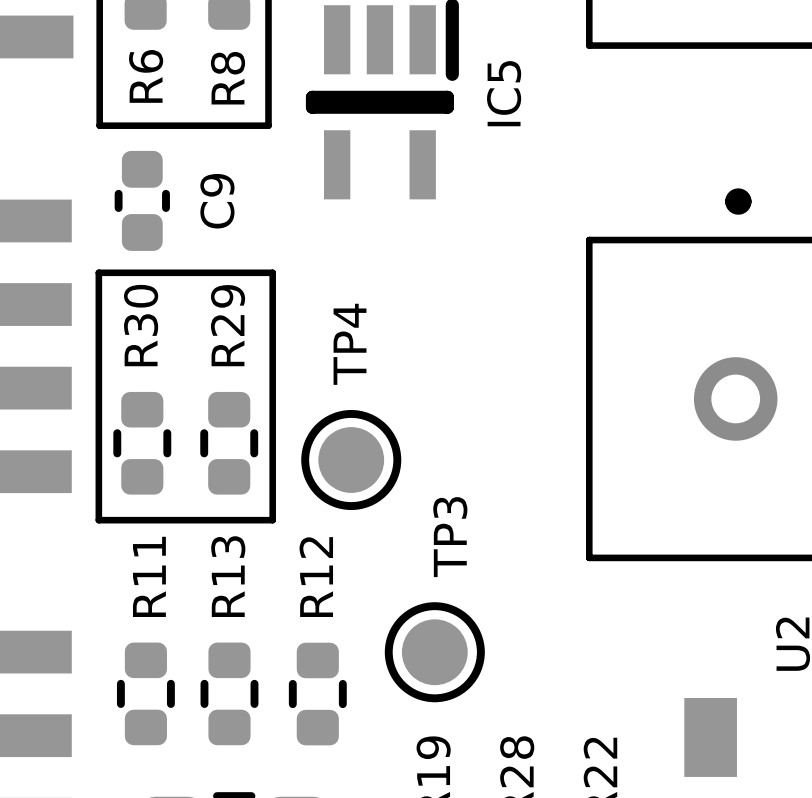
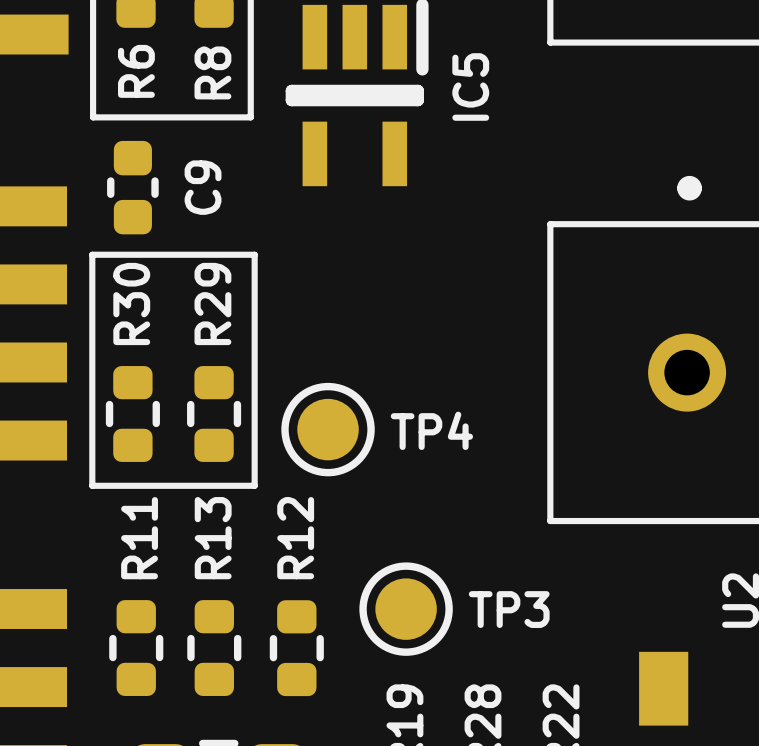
TP4 name rotation: 0° (350, 344) -> 90° clockwise (431, 430)
TP4 name position: TP4 (350, 344) -> TP4 (431, 430)
TP3 name rotation: 0° (450, 537) -> 90° clockwise (509, 609)
TP3 name position: TP3 (450, 537) -> TP3 (509, 609)

